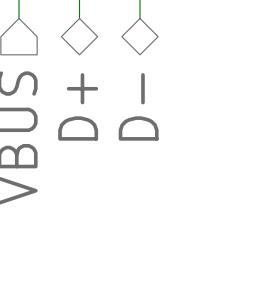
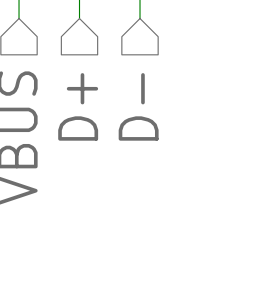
hierarchical label shape: bidirectional (78, 106) -> input (78, 106)
hierarchical label shape: bidirectional (138, 106) -> input (138, 106)

